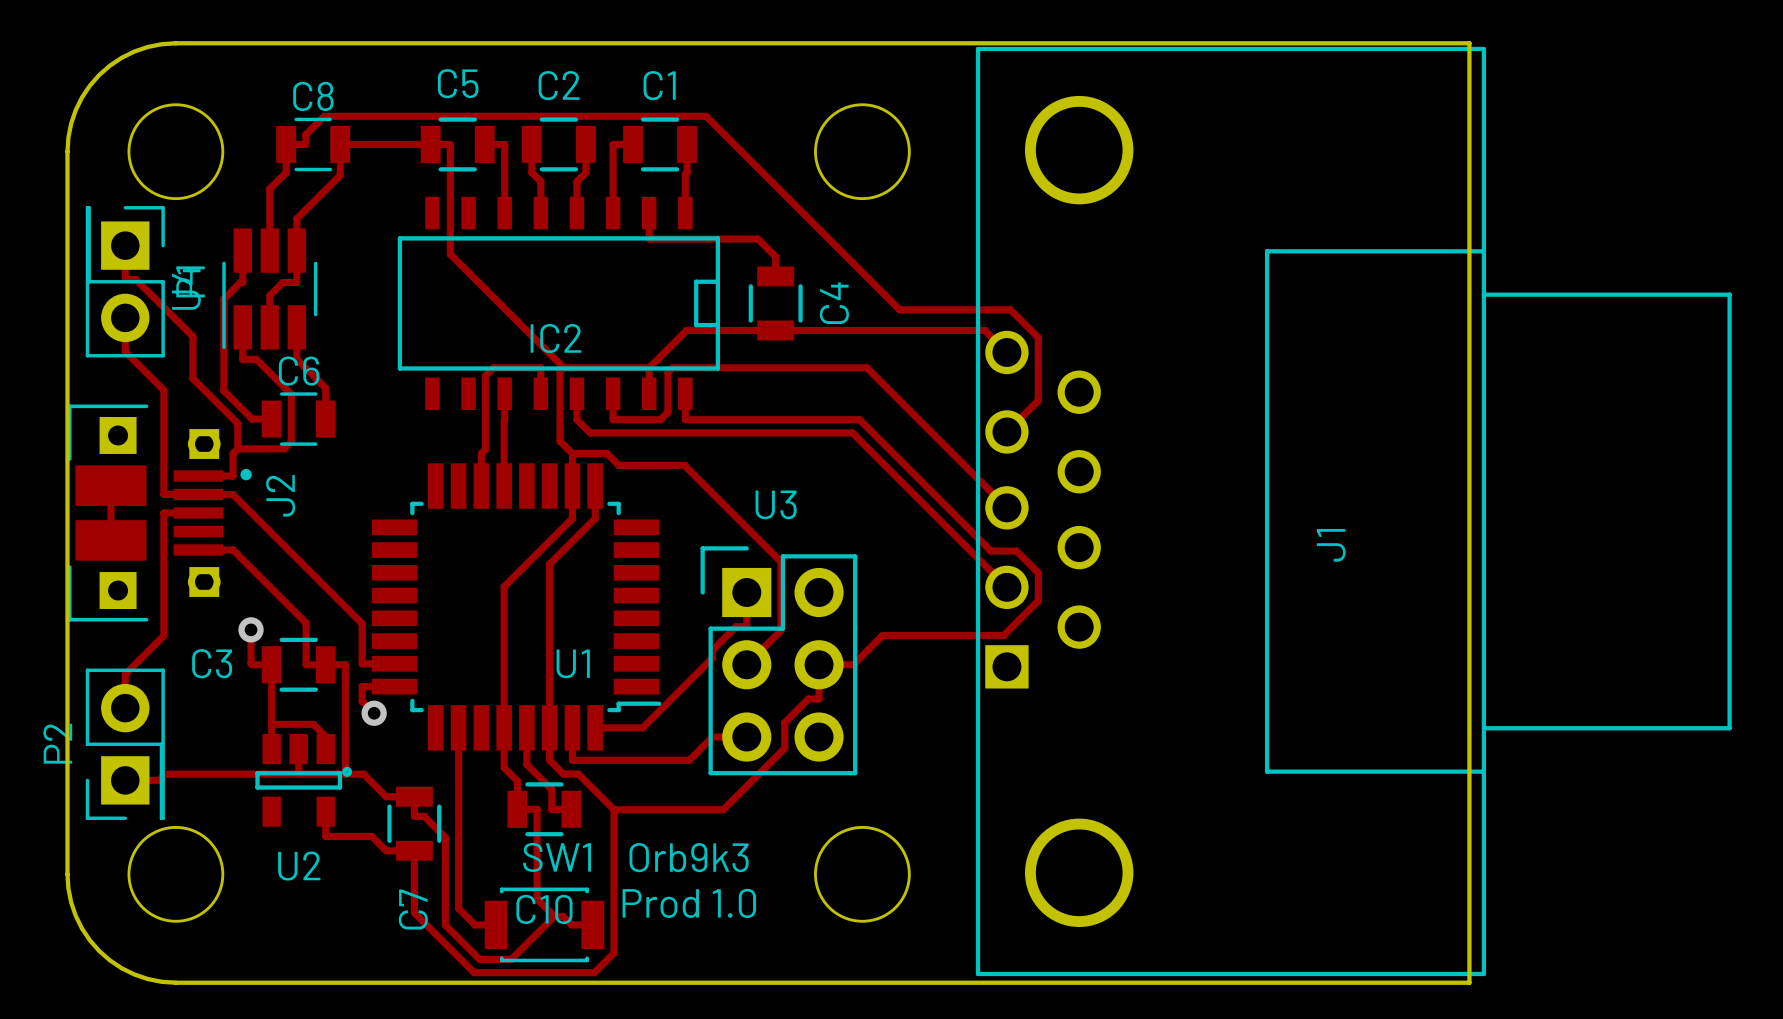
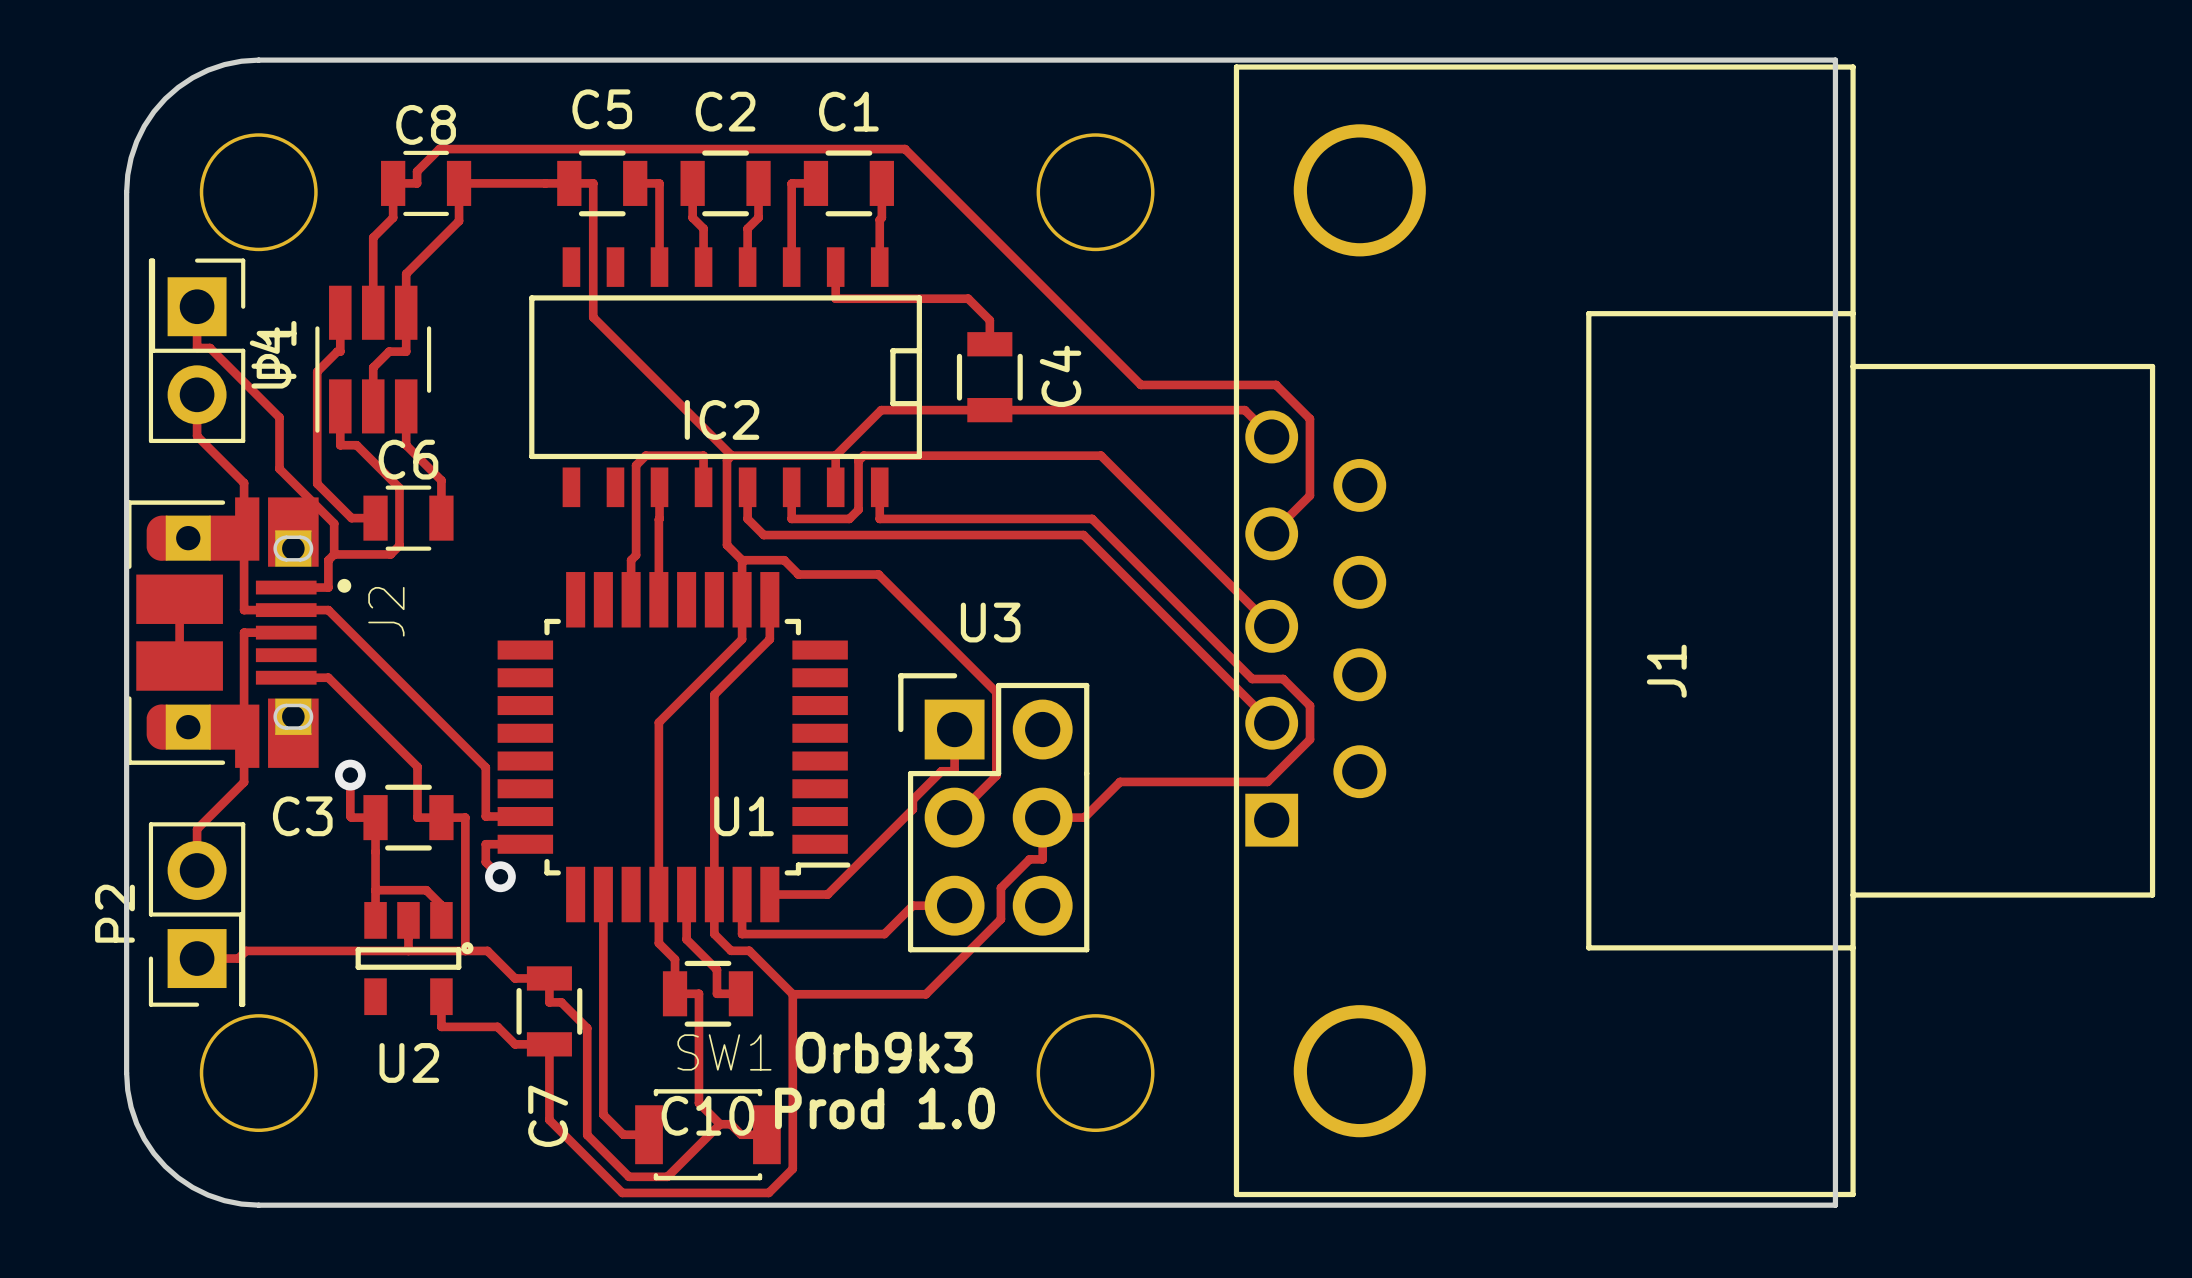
J2 footprint: [67, 404, 252, 622] -> [127, 497, 352, 768]

